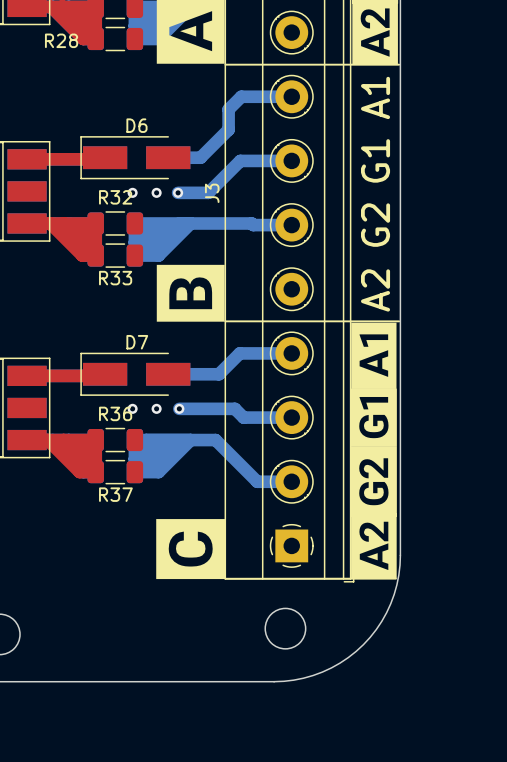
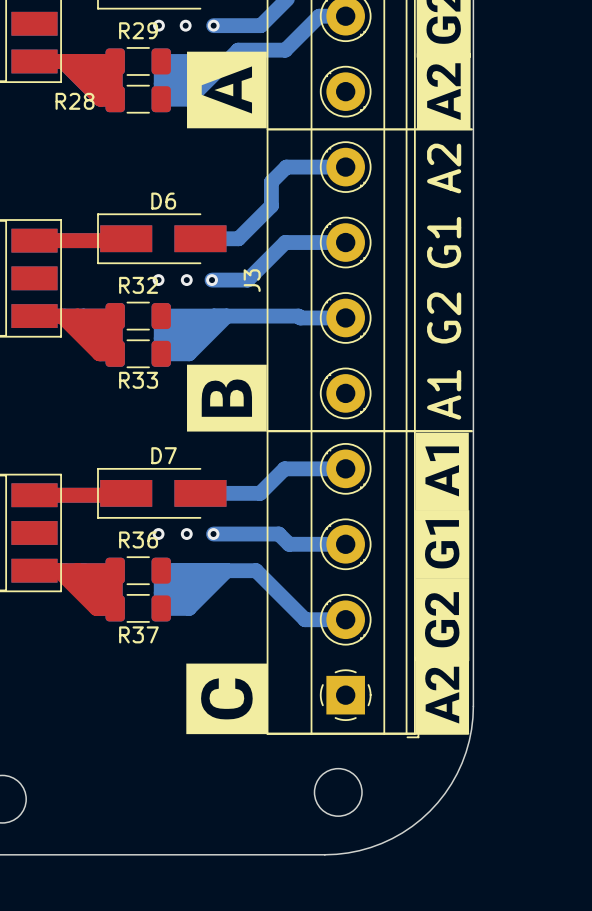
text: A1 (375, 97) -> A2 (444, 168)
text: A2 (375, 290) -> A1 (444, 394)

